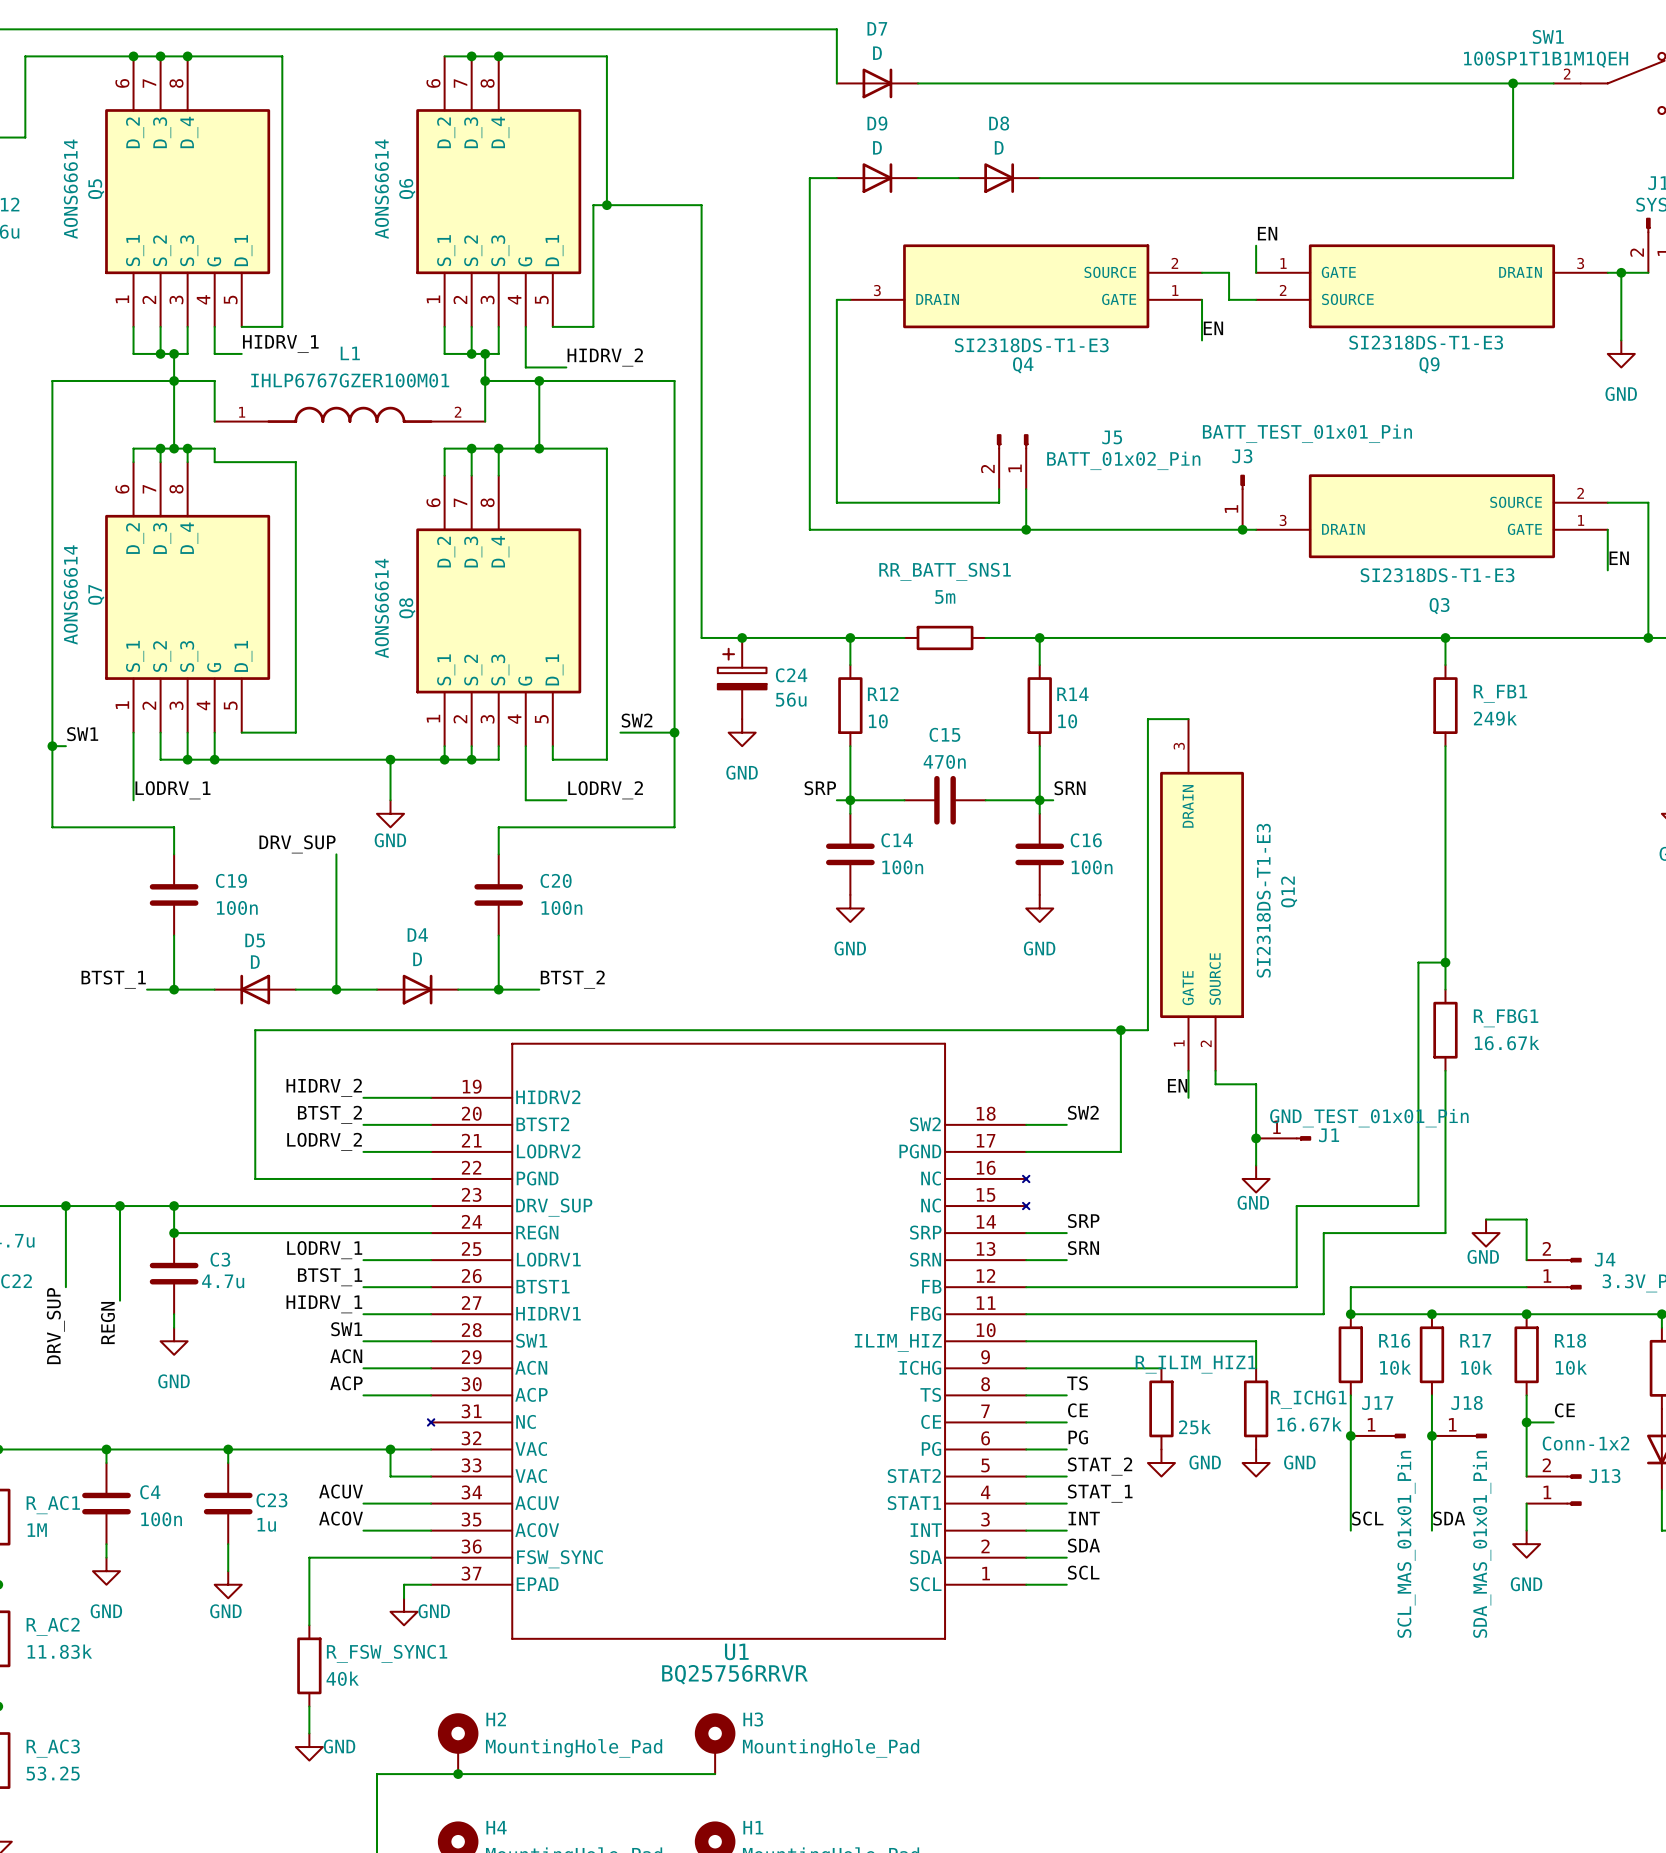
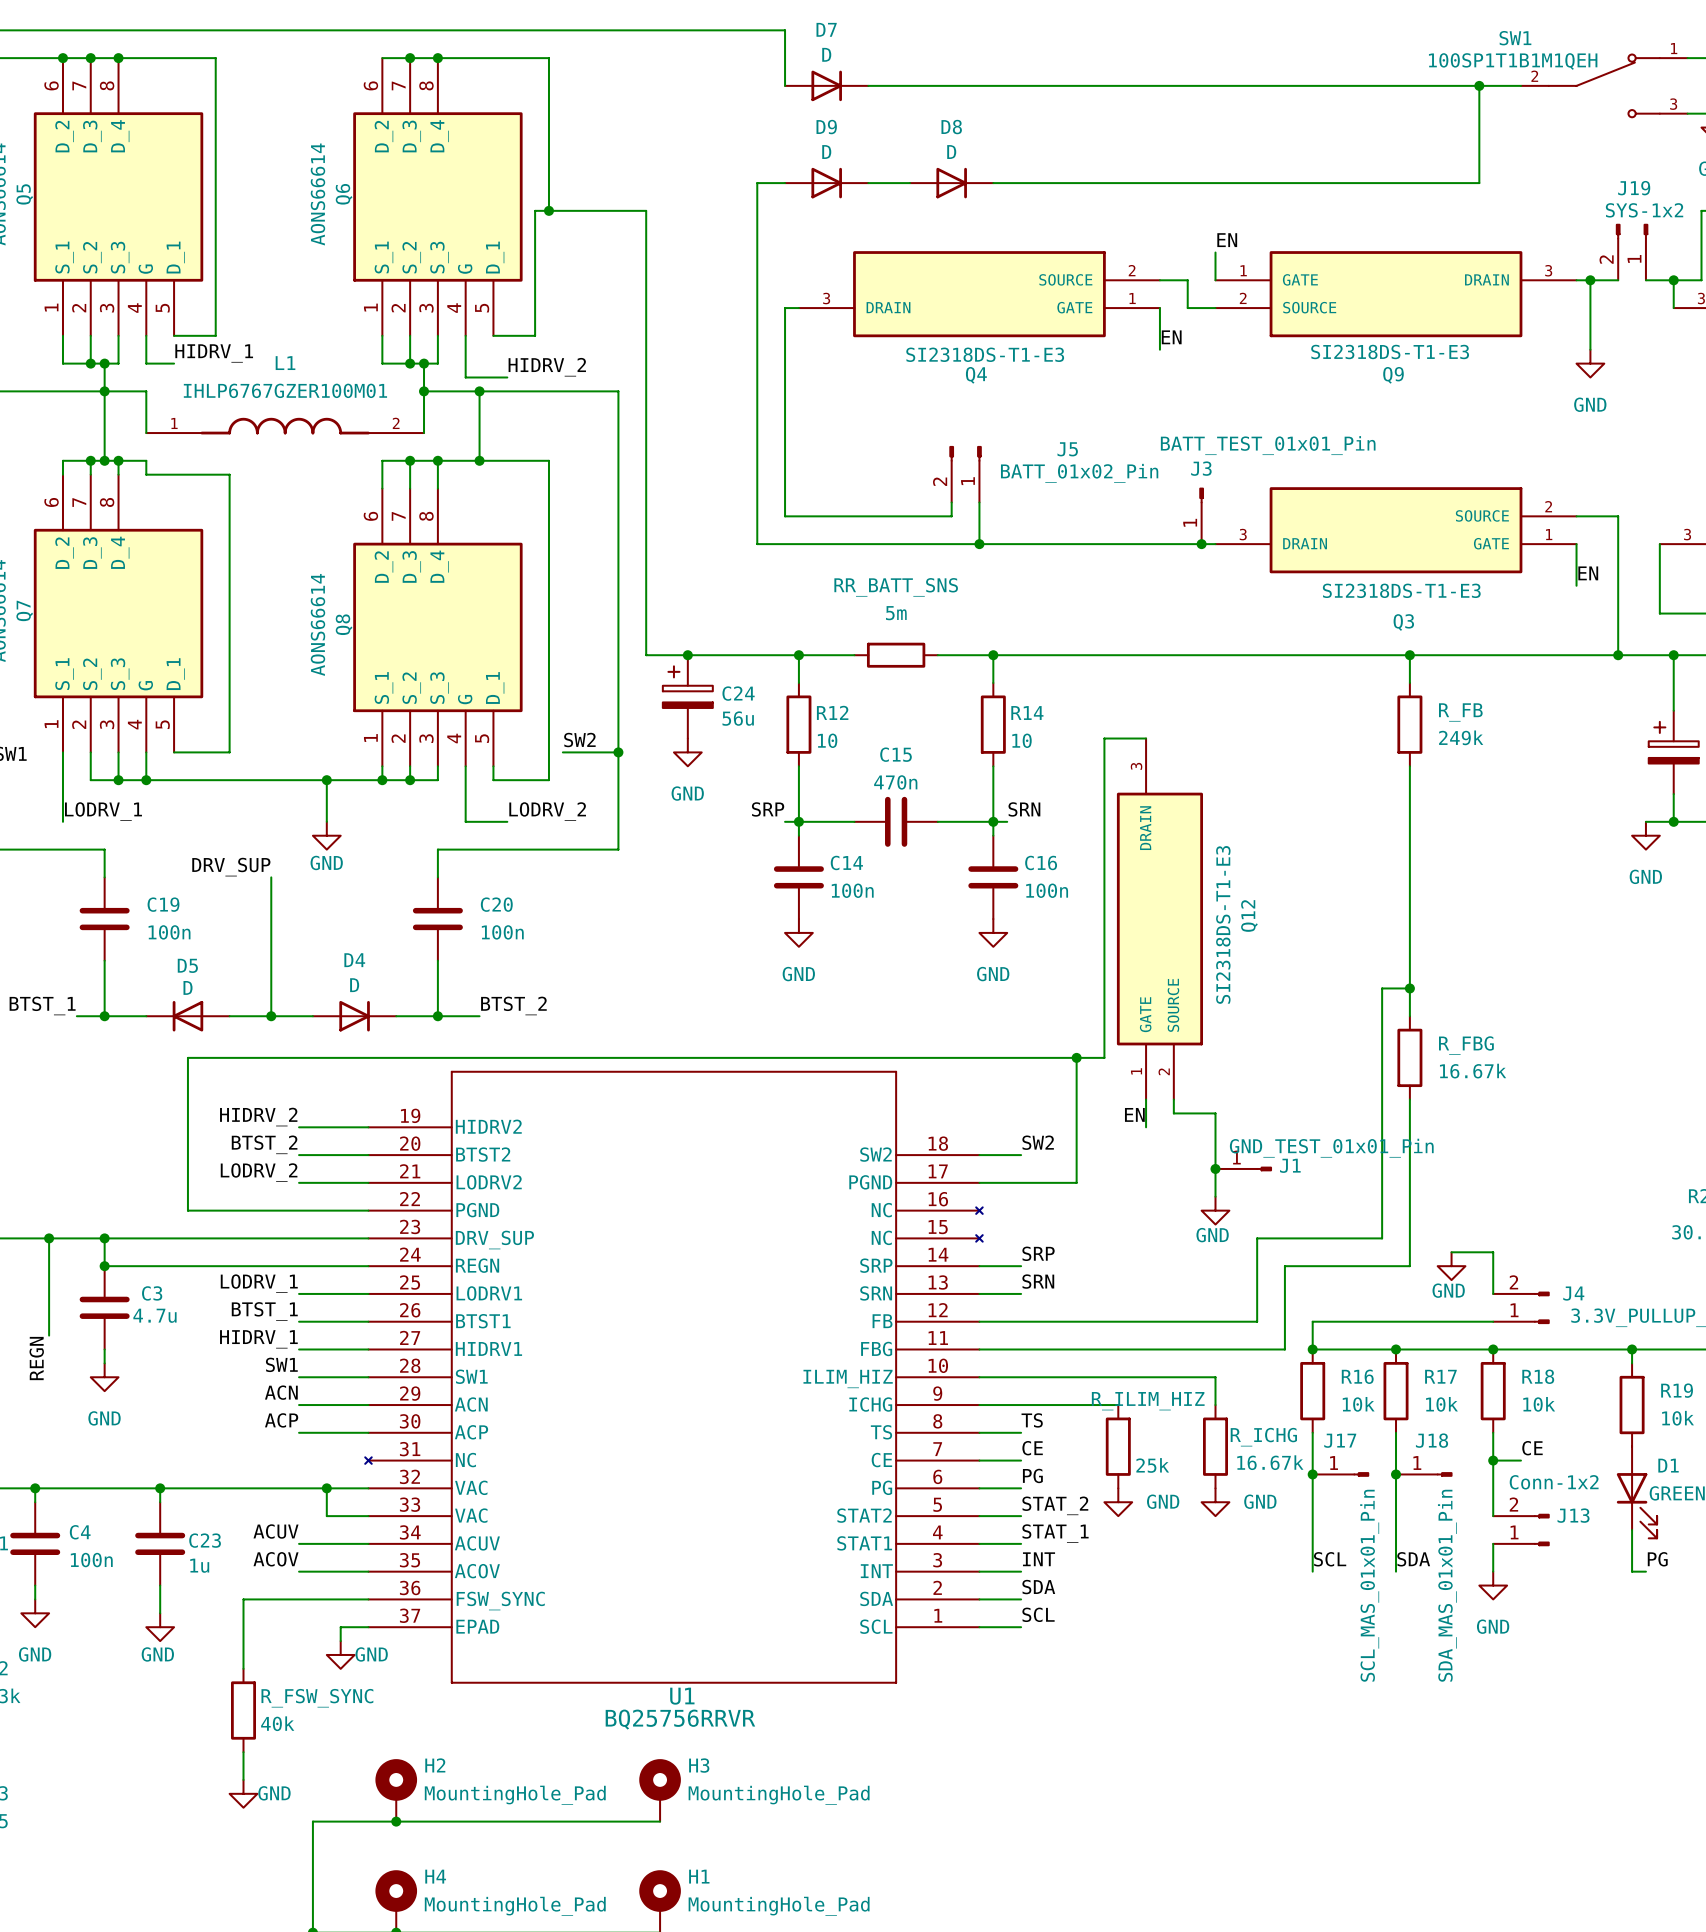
RR_BATT_SNS1 name: RR_BATT_SNS1 (945, 571) -> RR_BATT_SNS (896, 587)
R_FB1 name: R_FB1 (1500, 693) -> R_FB (1460, 712)
R_FBG1 name: R_FBG1 (1506, 1018) -> R_FBG (1466, 1045)
R_ILIM_HIZ1 name: R_ILIM_HIZ1 (1195, 1364) -> R_ILIM_HIZ (1148, 1401)
R_ICHG1 name: R_ICHG1 (1308, 1399) -> R_ICHG (1263, 1437)
R_FSW_SYNC1 name: R_FSW_SYNC1 (387, 1653) -> R_FSW_SYNC (317, 1698)

